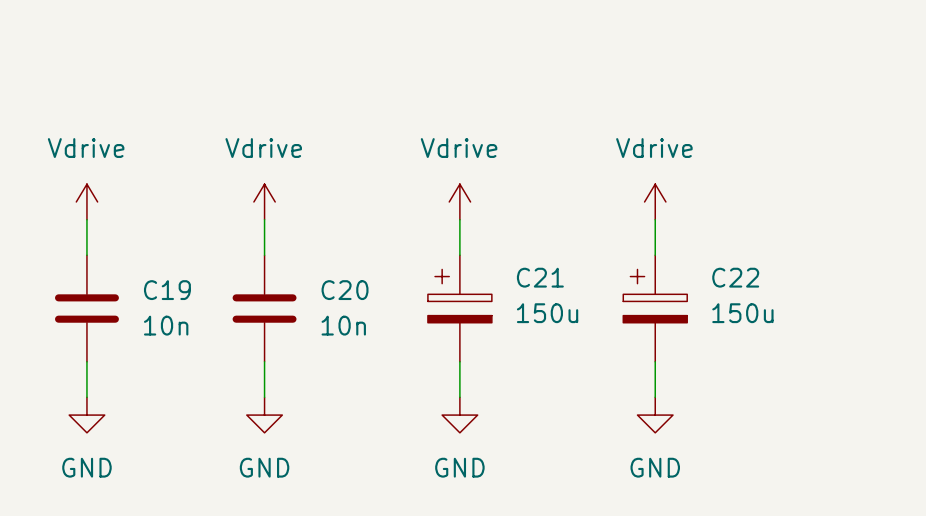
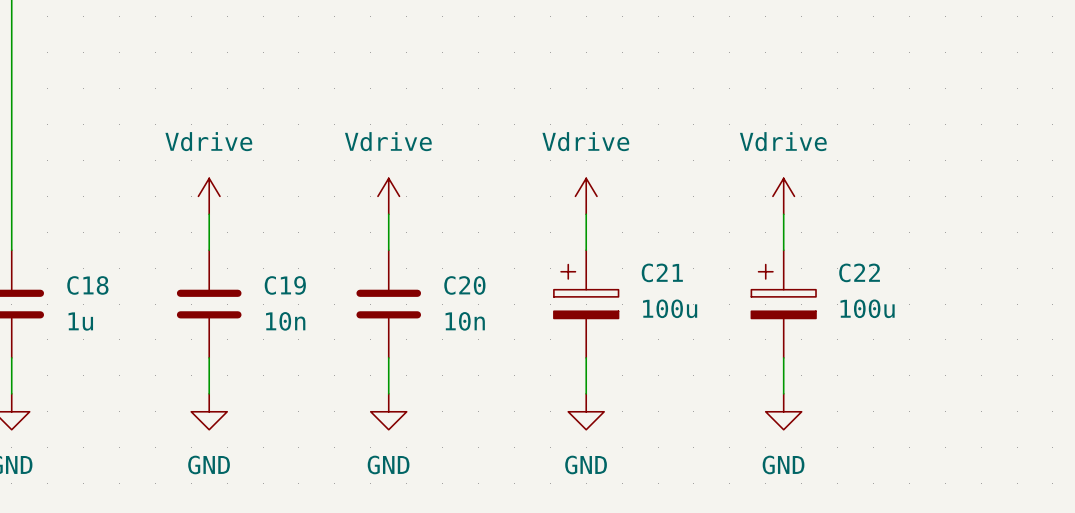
C21 value: 150u (547, 313) -> 100u (670, 308)
C22 value: 150u (742, 313) -> 100u (867, 308)

